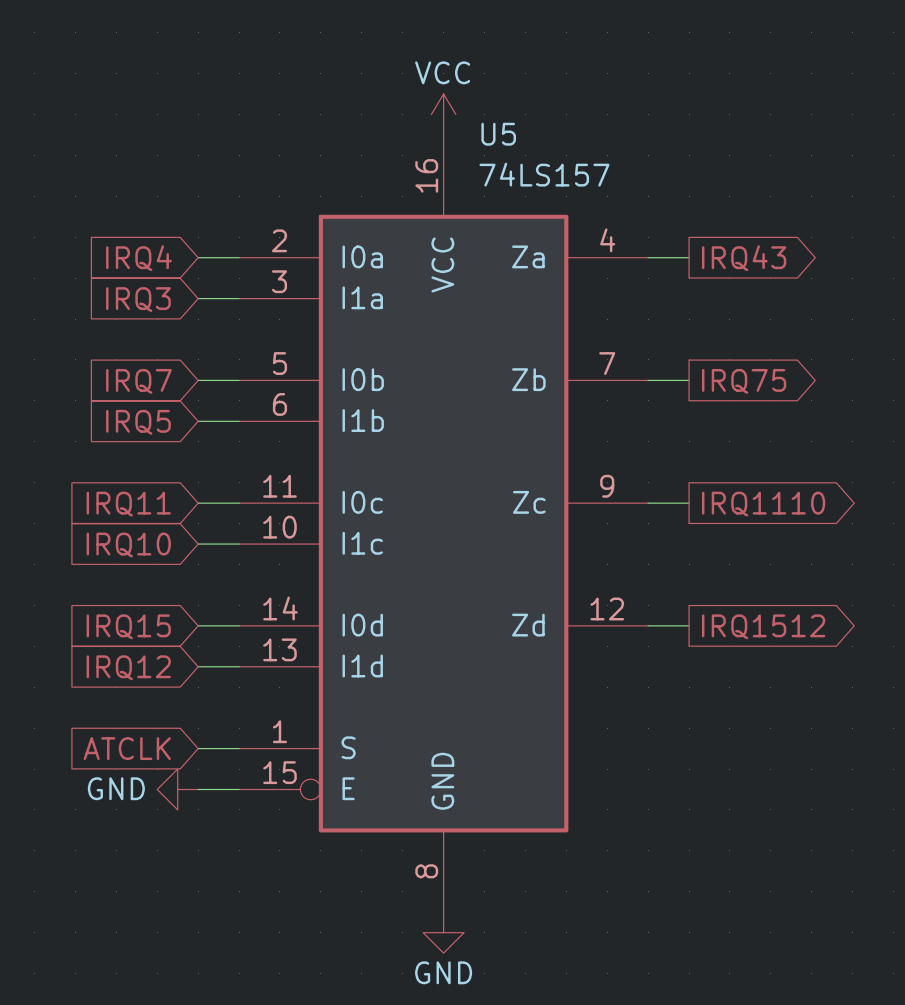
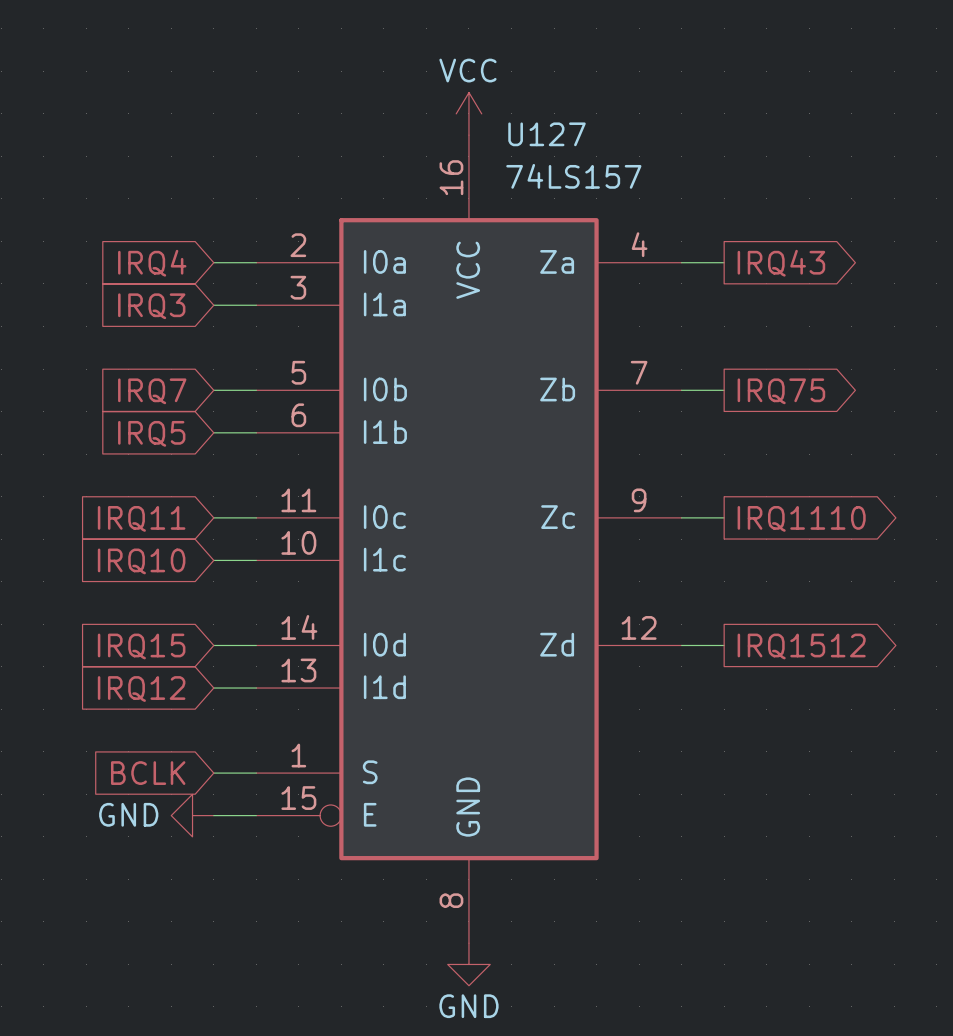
U5 name: U5 (498, 134) -> U127 (546, 134)
global label: ATCLK (127, 748) -> BCLK (148, 773)

